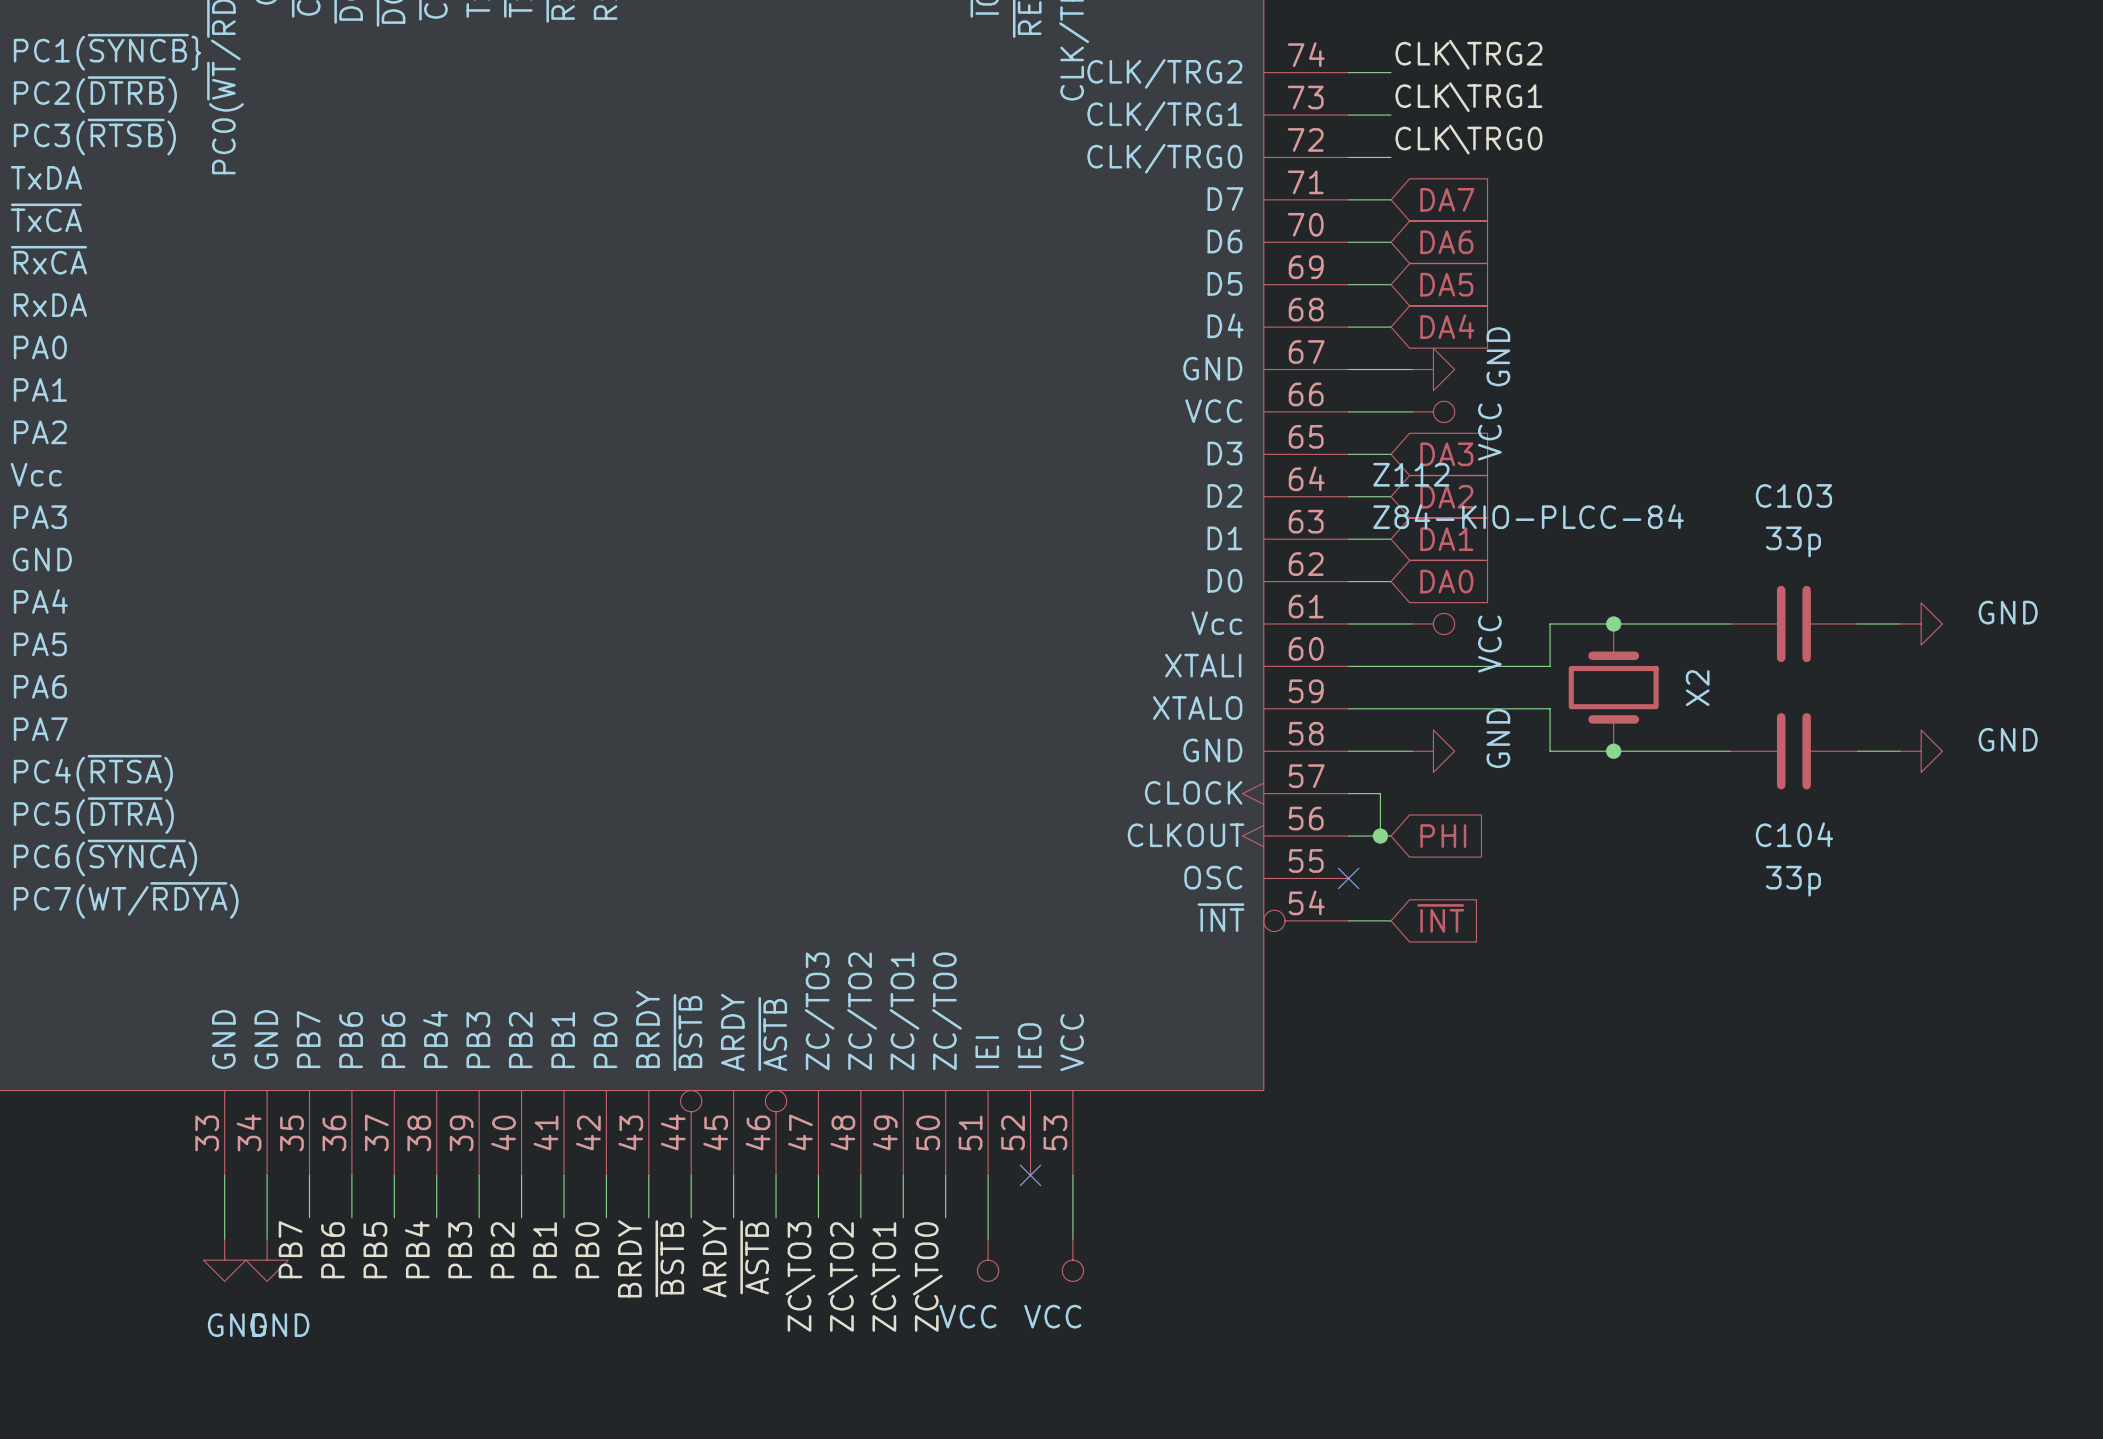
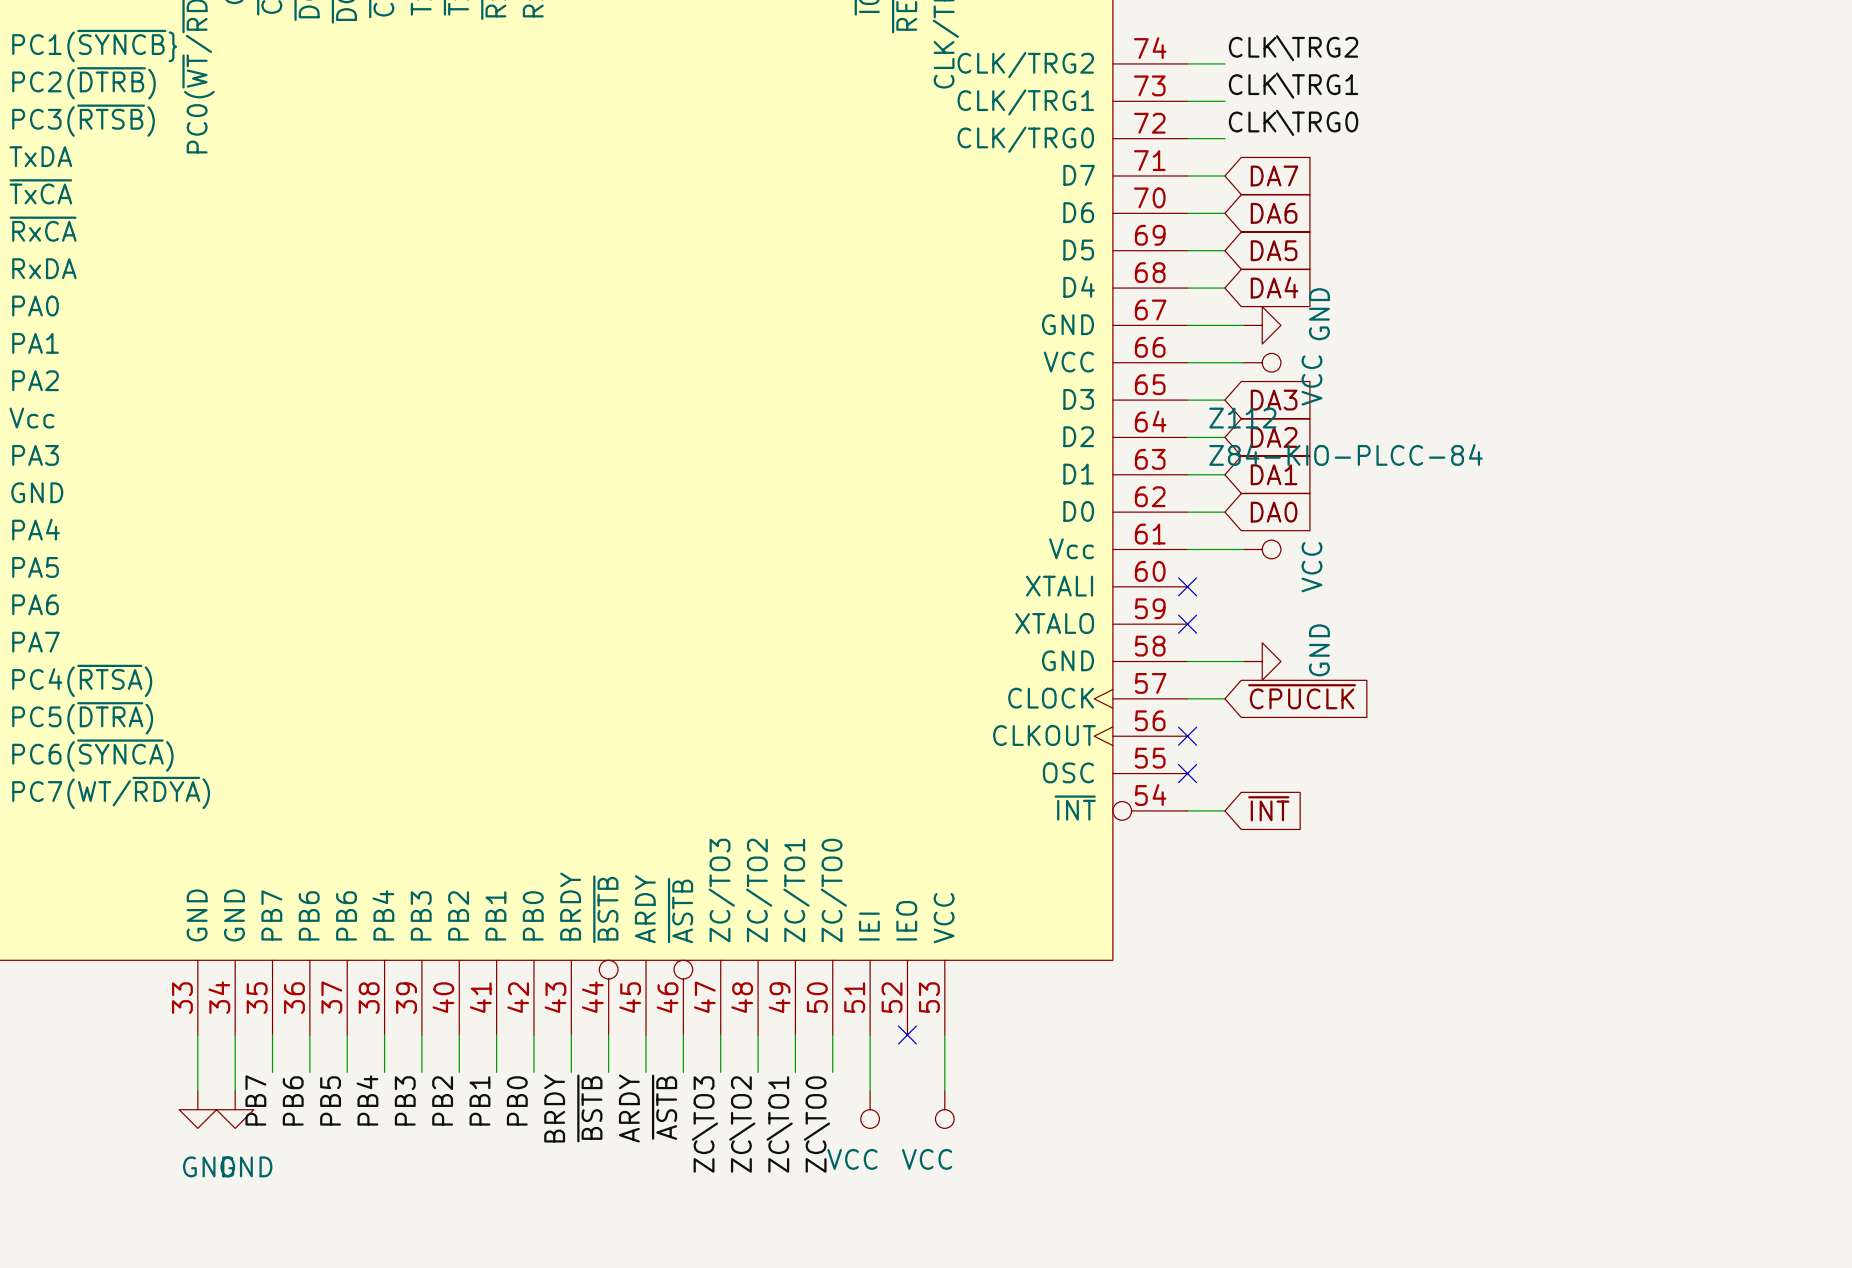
junction: (1613, 623) -> none
wire: (1730, 623) (1550, 623) (1550, 666) (1348, 666) -> none
C103: 33p (1793, 623) -> none
wire: (1857, 623) (1899, 623) -> none
power symbol: GND (1921, 623) -> none
no-connect mark: none -> (1187, 586)
X2: (1613, 687) -> none
wire: (1348, 708) (1550, 708) (1550, 751) (1730, 751) -> none
no-connect mark: none -> (1187, 624)
junction: (1613, 751) -> none
C104: 33p (1793, 751) -> none
wire: (1857, 751) (1899, 751) -> none
power symbol: GND (1921, 751) -> none
global label: none -> ~{CPUCLK} (1302, 696)
wire: (1380, 793) (1380, 836) -> (1215, 698) (1224, 698)
wire: (1348, 836) (1391, 836) -> none
no-connect mark: none -> (1187, 736)
junction: (1380, 836) -> none
global label: PHI (1443, 836) -> none

